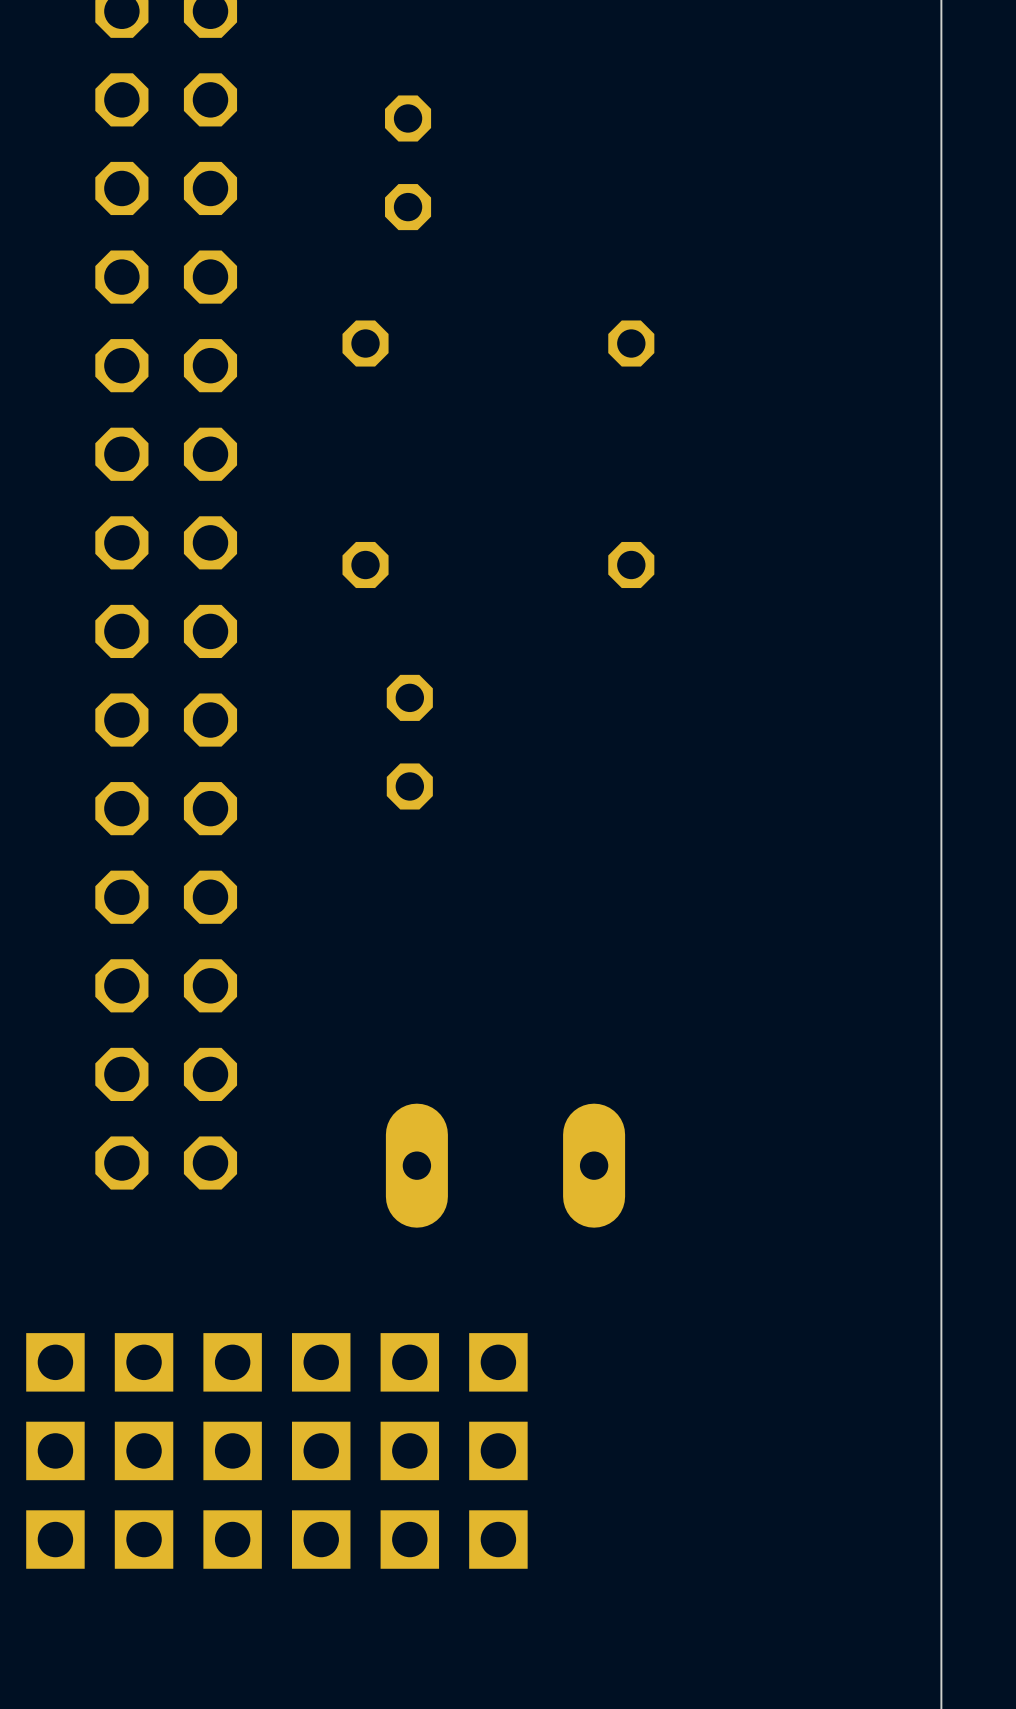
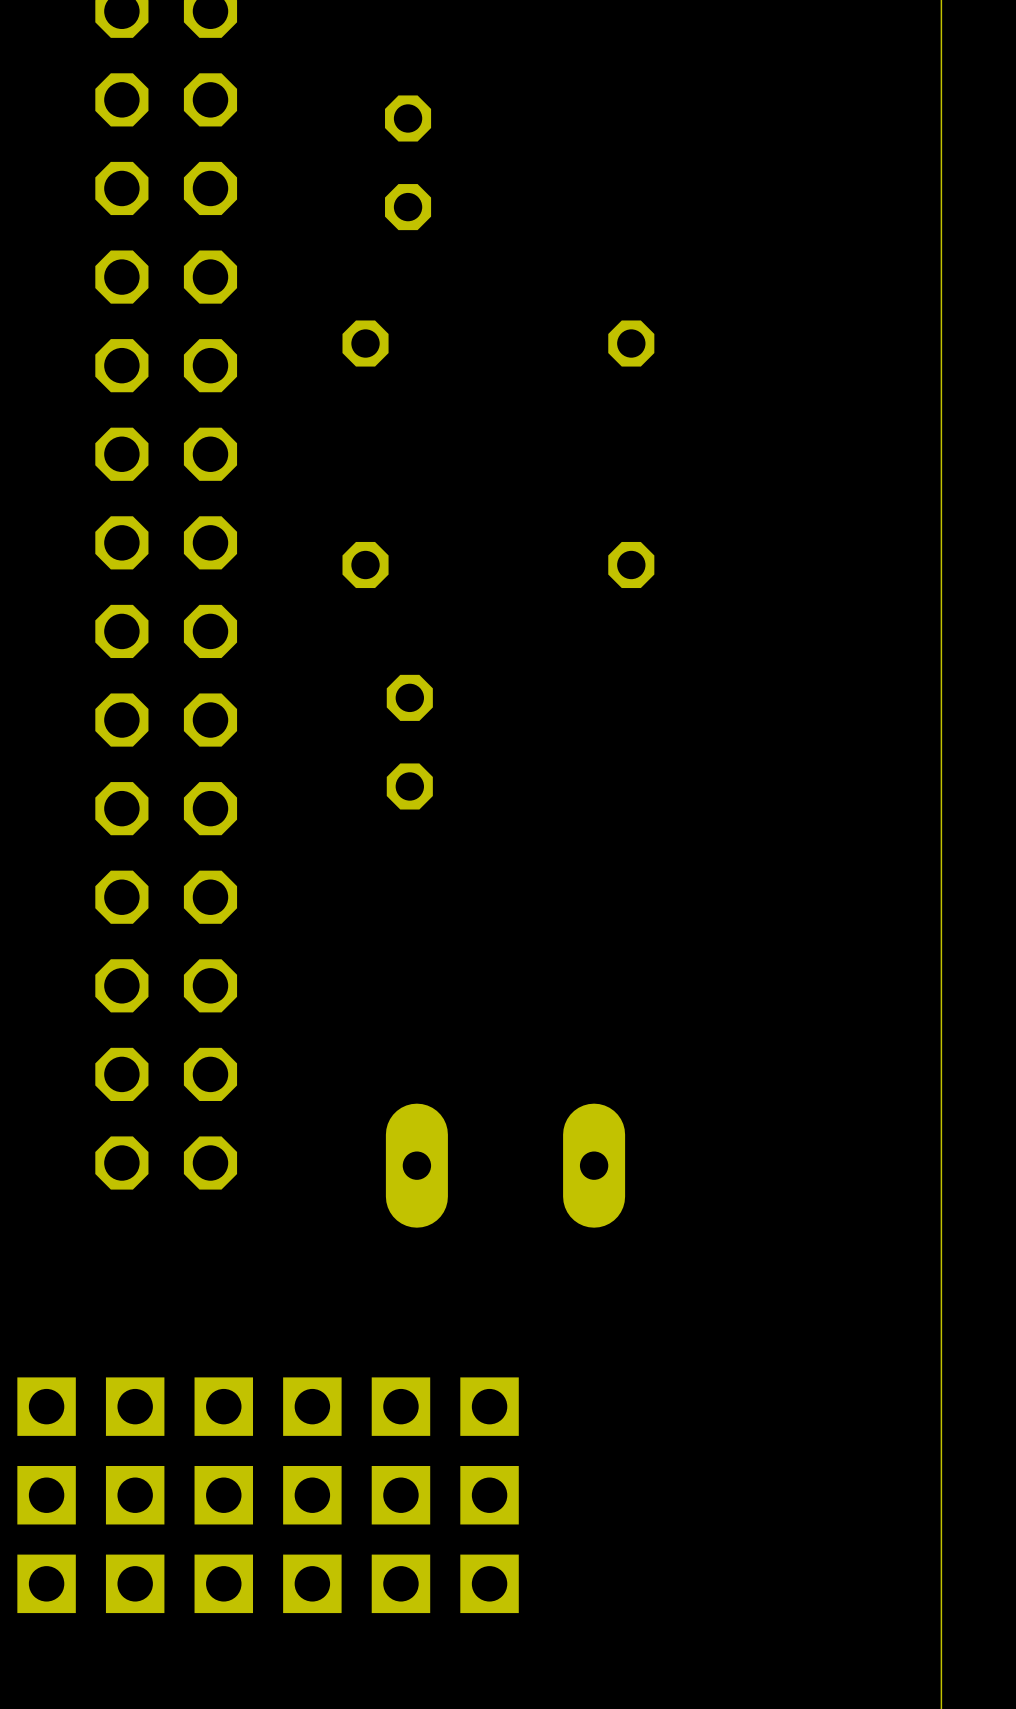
part position: (55, 1450) -> (46, 1495)
part position: (144, 1450) -> (135, 1495)
part position: (232, 1450) -> (223, 1495)
part position: (321, 1450) -> (312, 1495)
part position: (409, 1450) -> (400, 1495)
part position: (498, 1450) -> (489, 1495)

